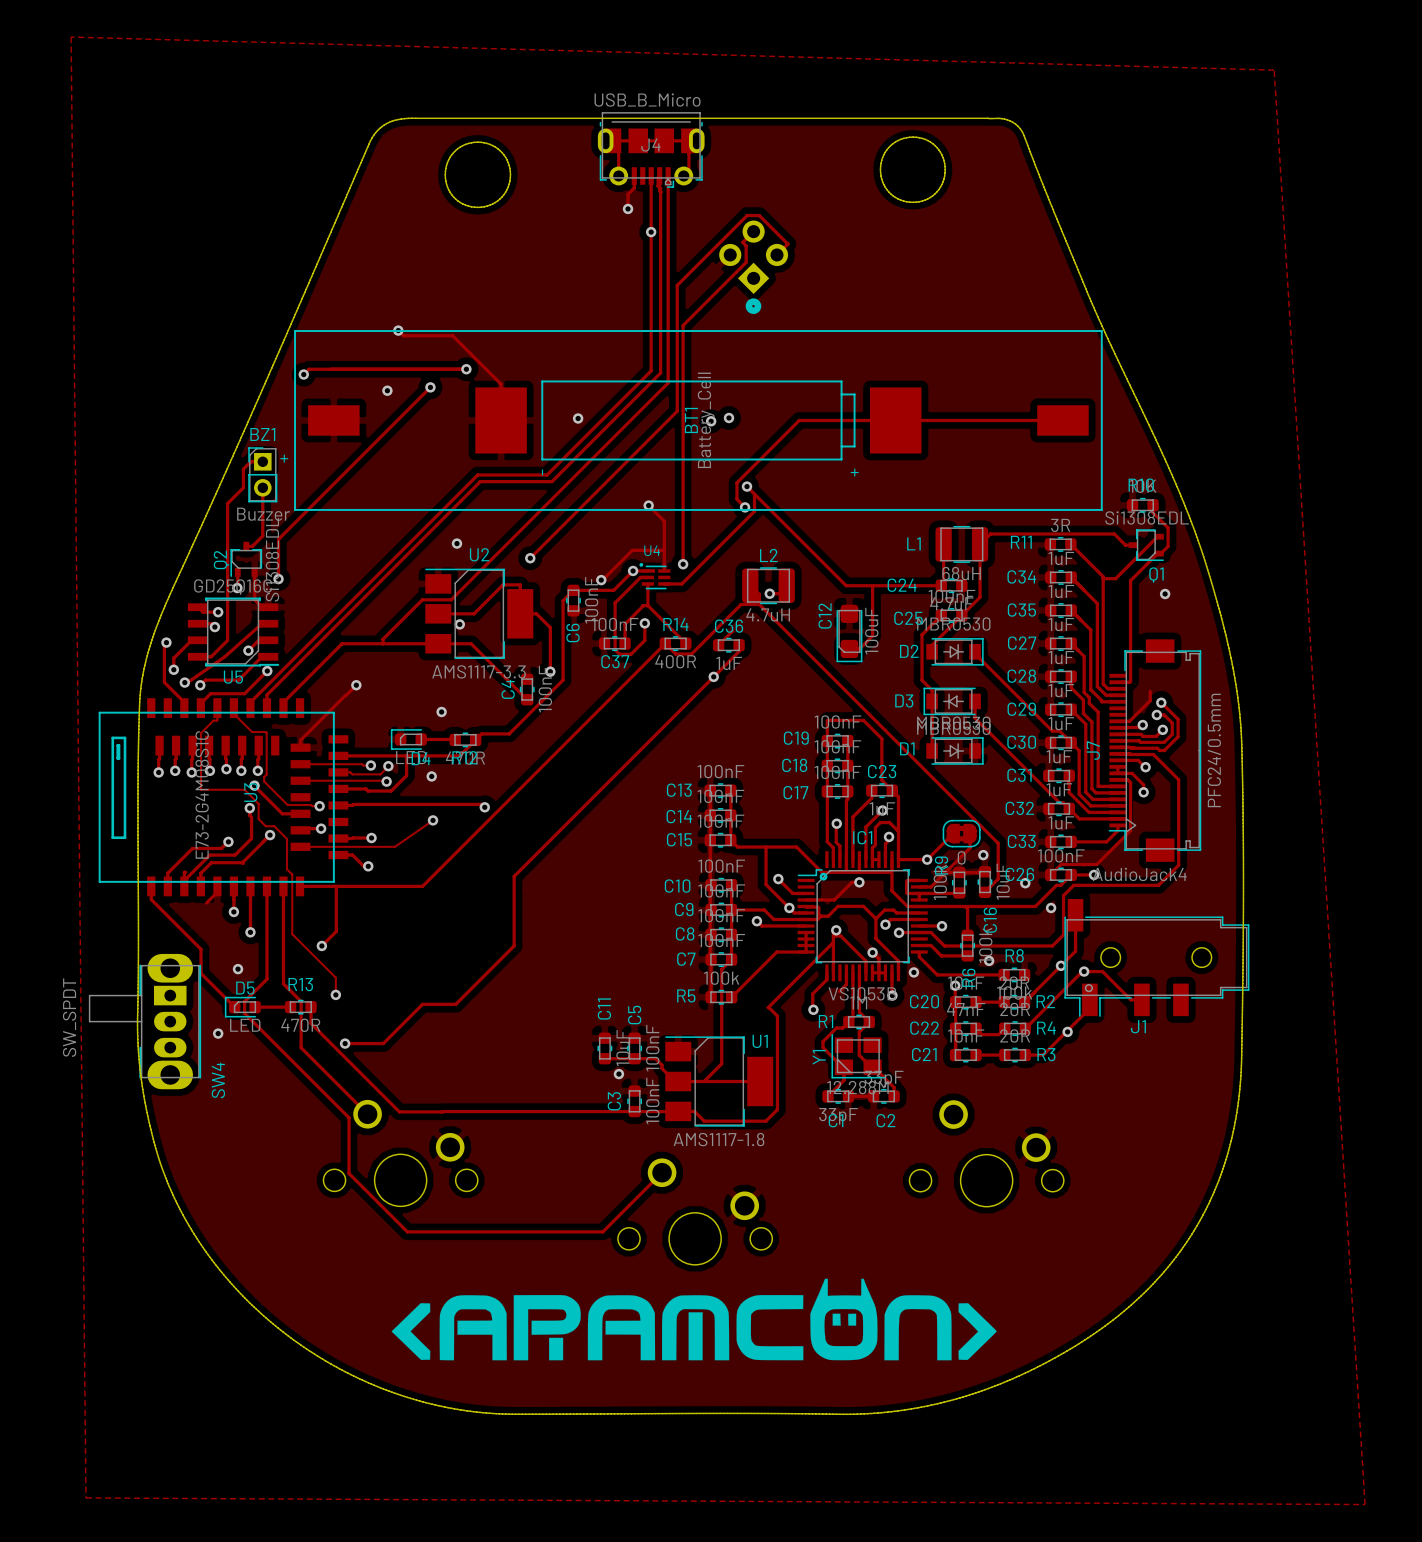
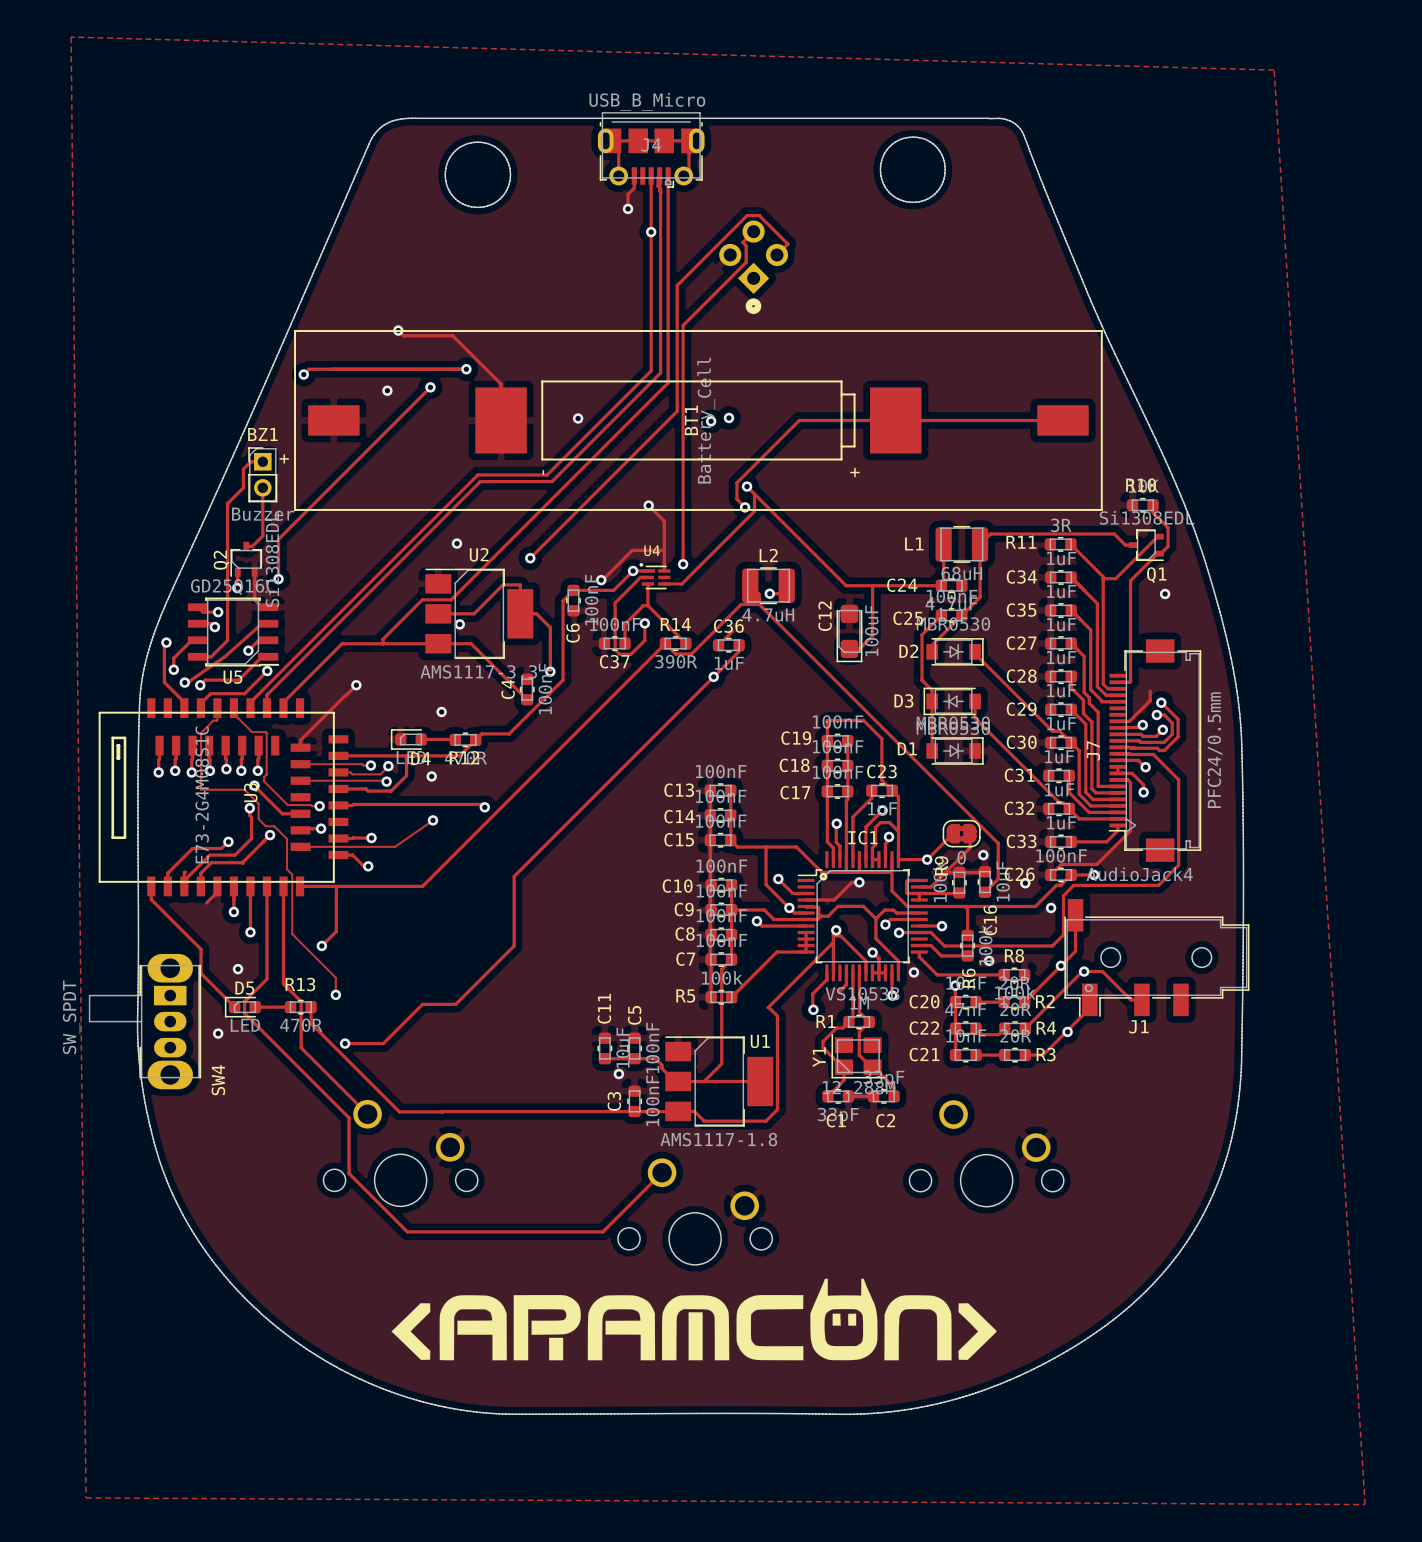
R14 value: 400R (675, 661) -> 390R (676, 661)

